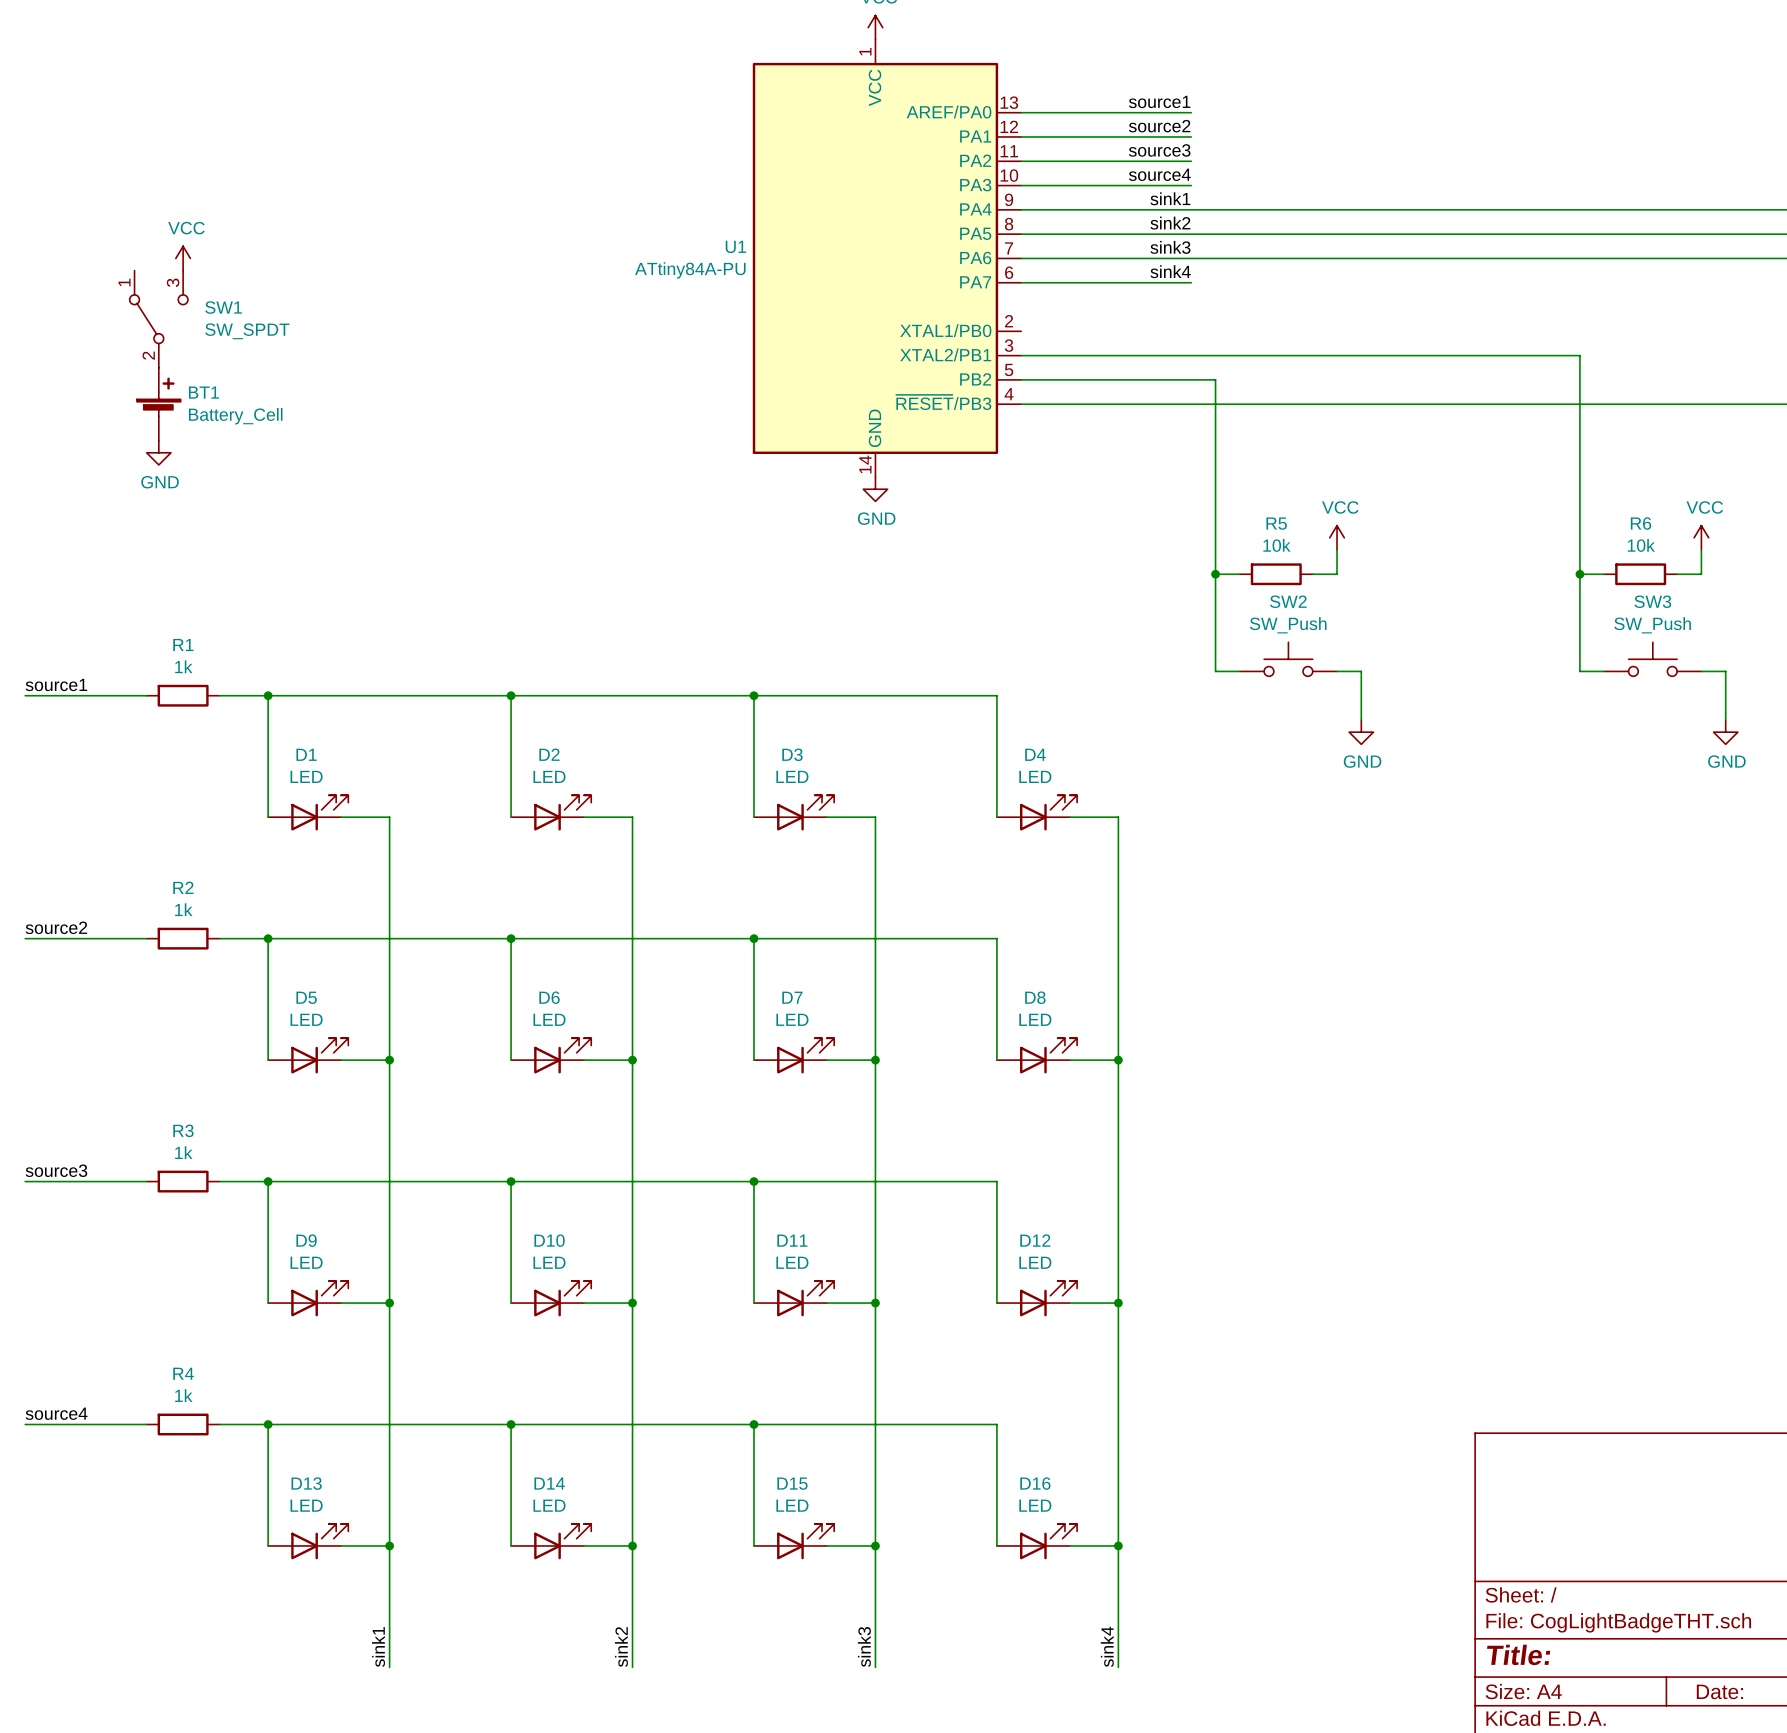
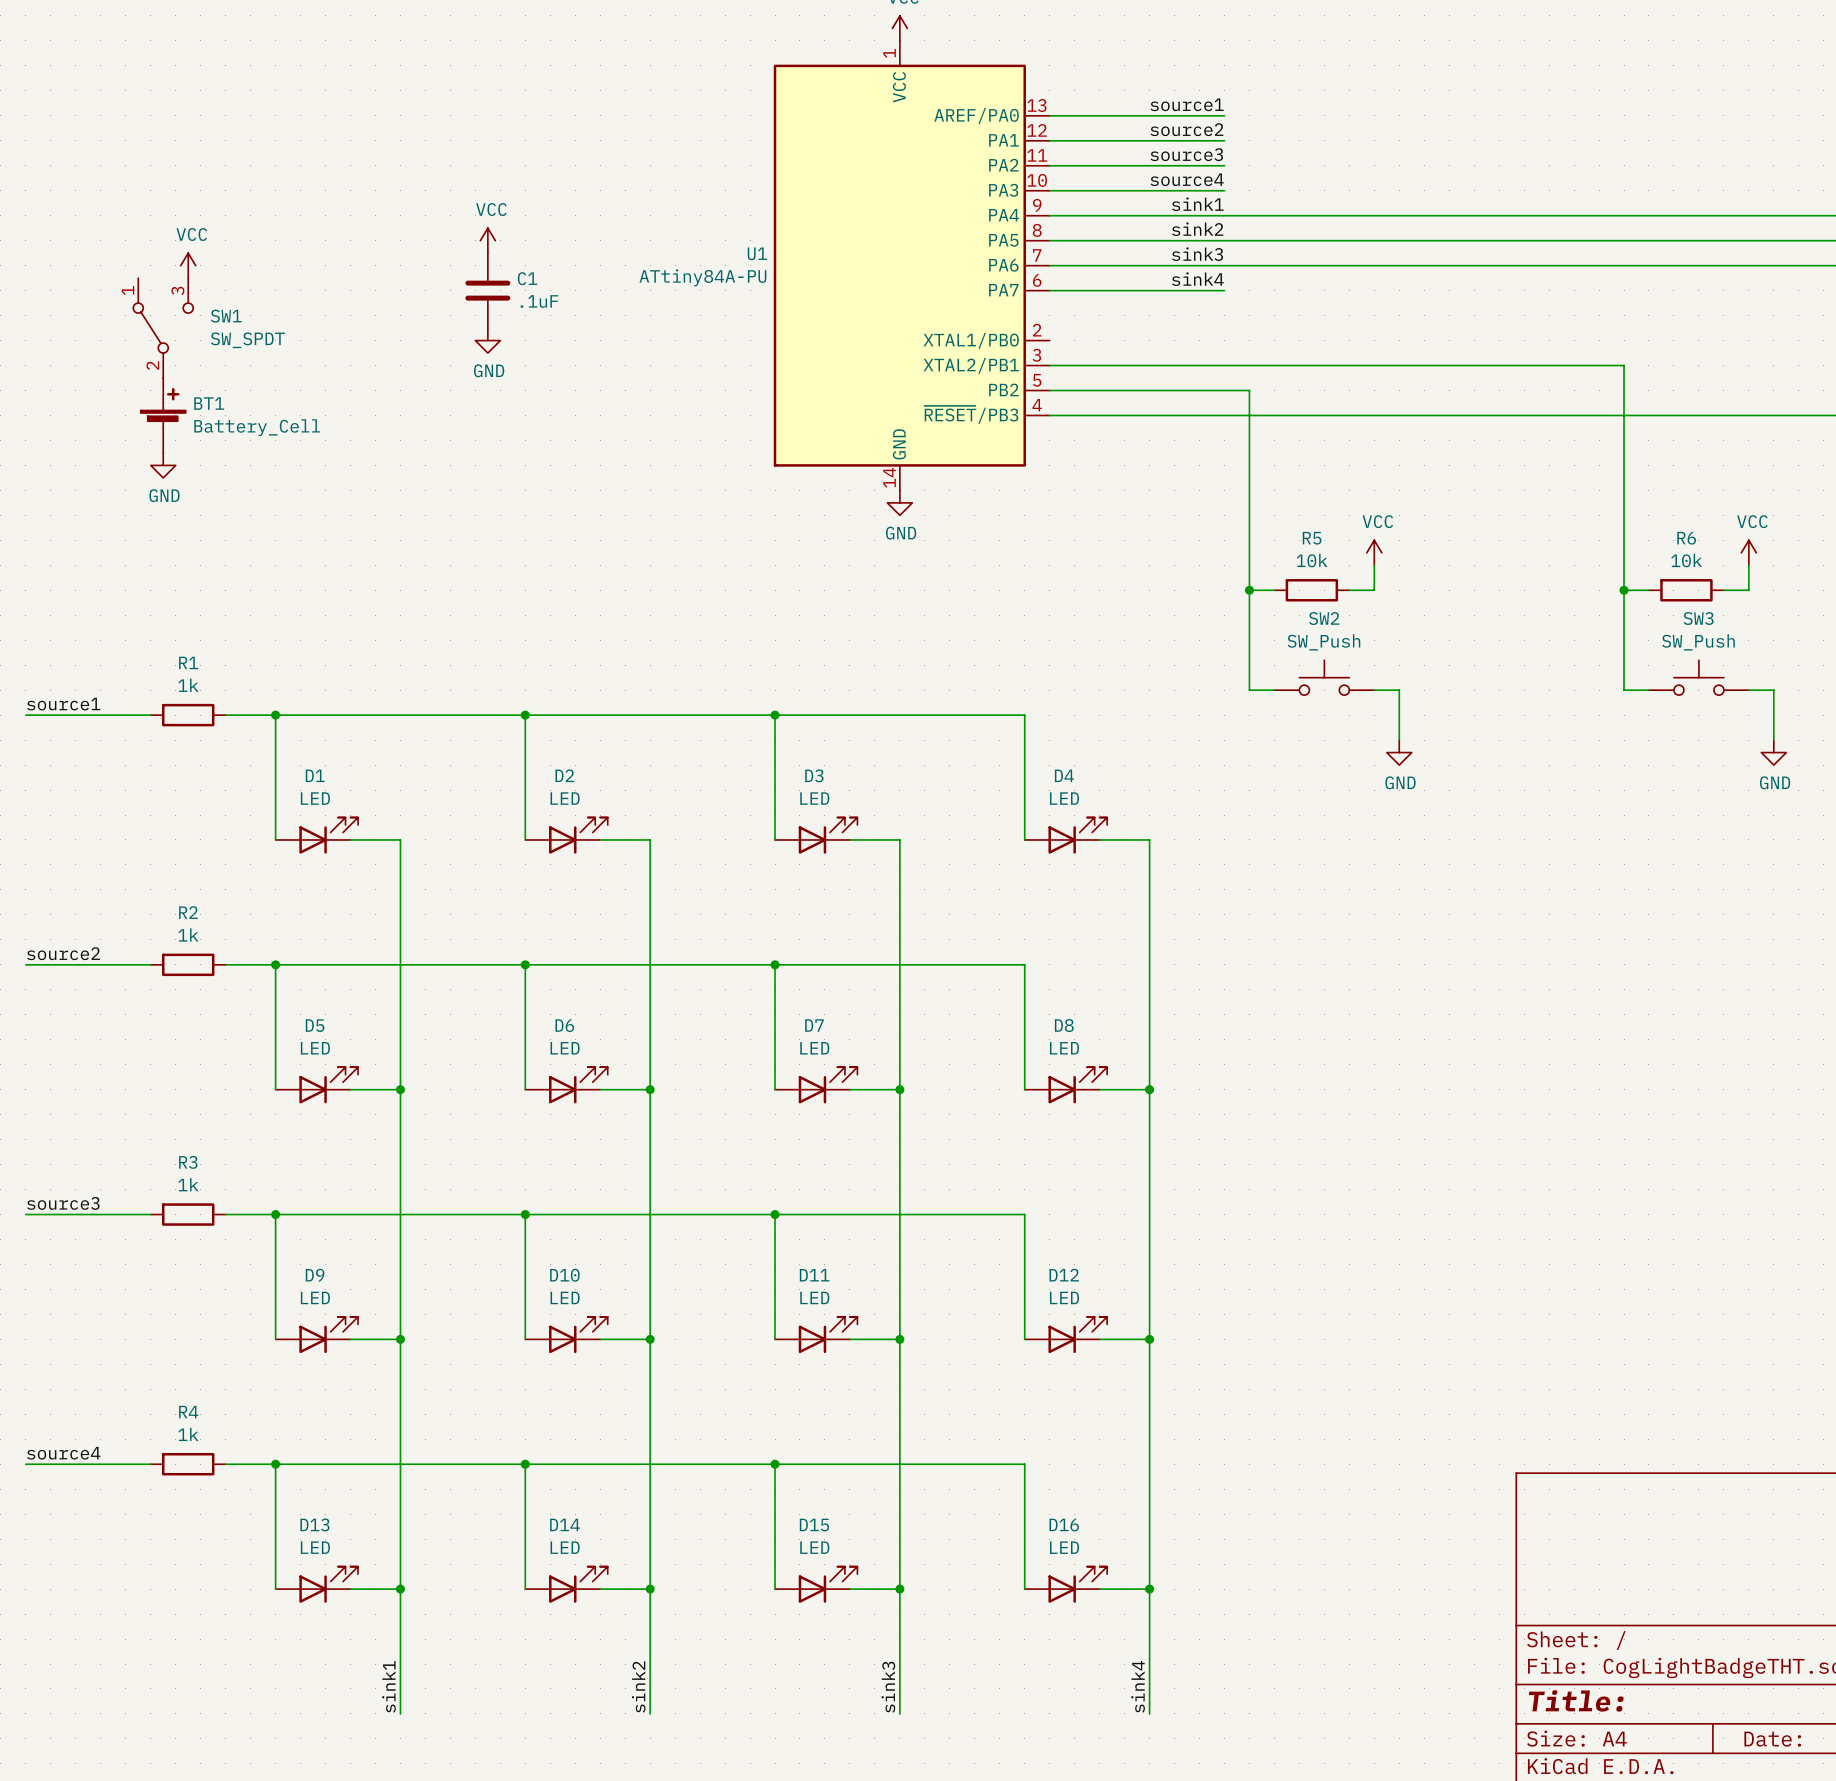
power symbol: none -> VCC (487, 240)
C1: none -> .1uF (487, 290)
power symbol: none -> GND (487, 340)

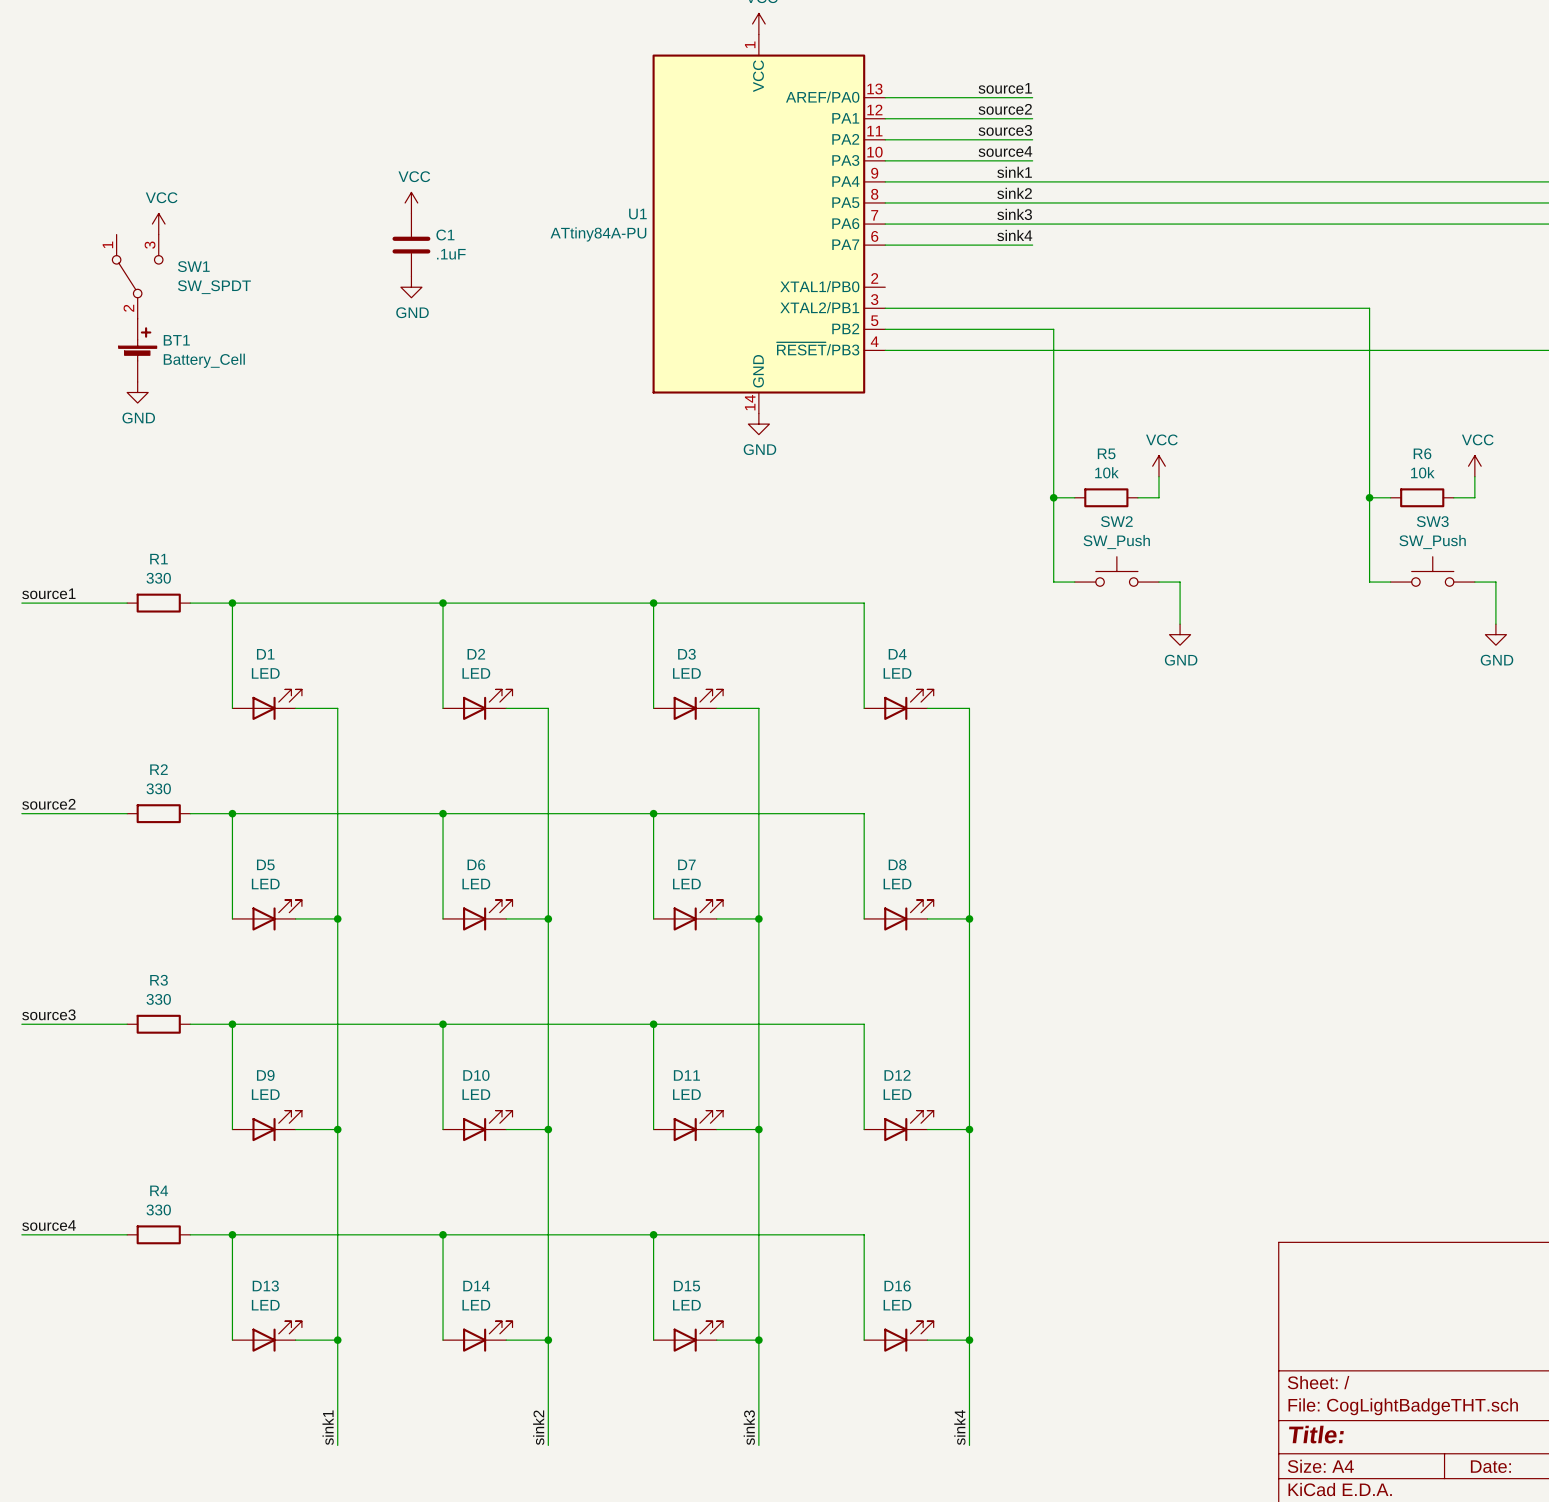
R1 value: 1k (188, 685) -> 330 (158, 578)
R2 value: 1k (188, 935) -> 330 (158, 788)
R3 value: 1k (188, 1184) -> 330 (158, 999)
R4 value: 1k (188, 1434) -> 330 (158, 1210)

